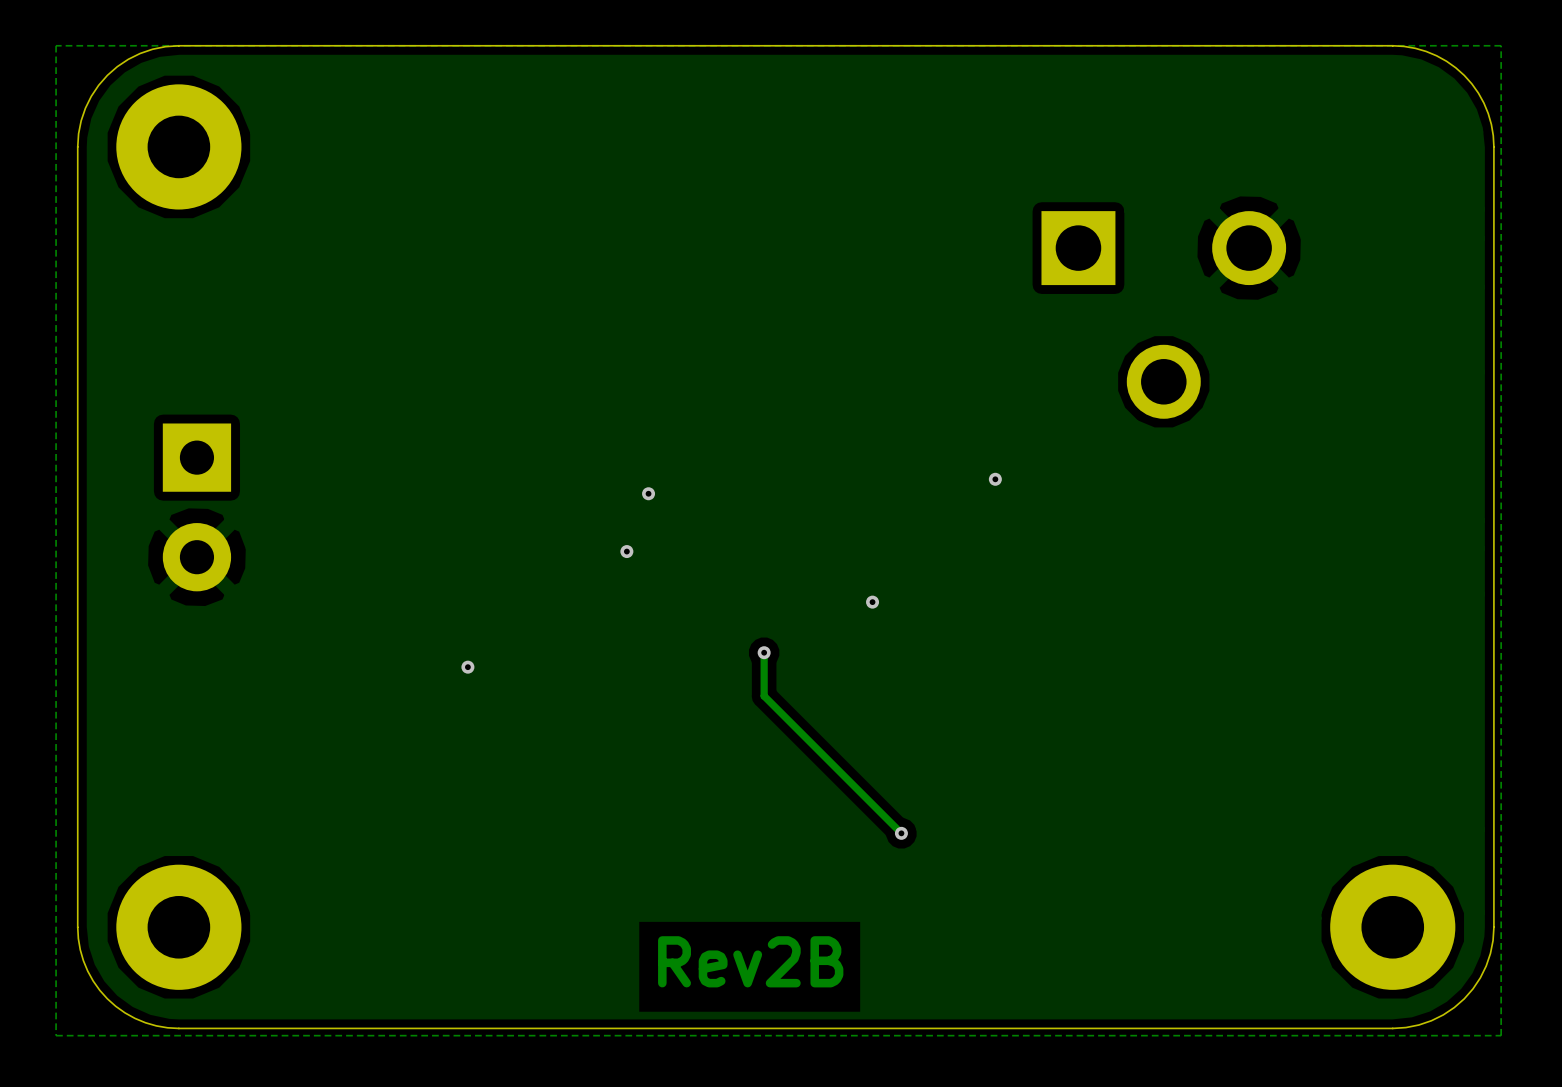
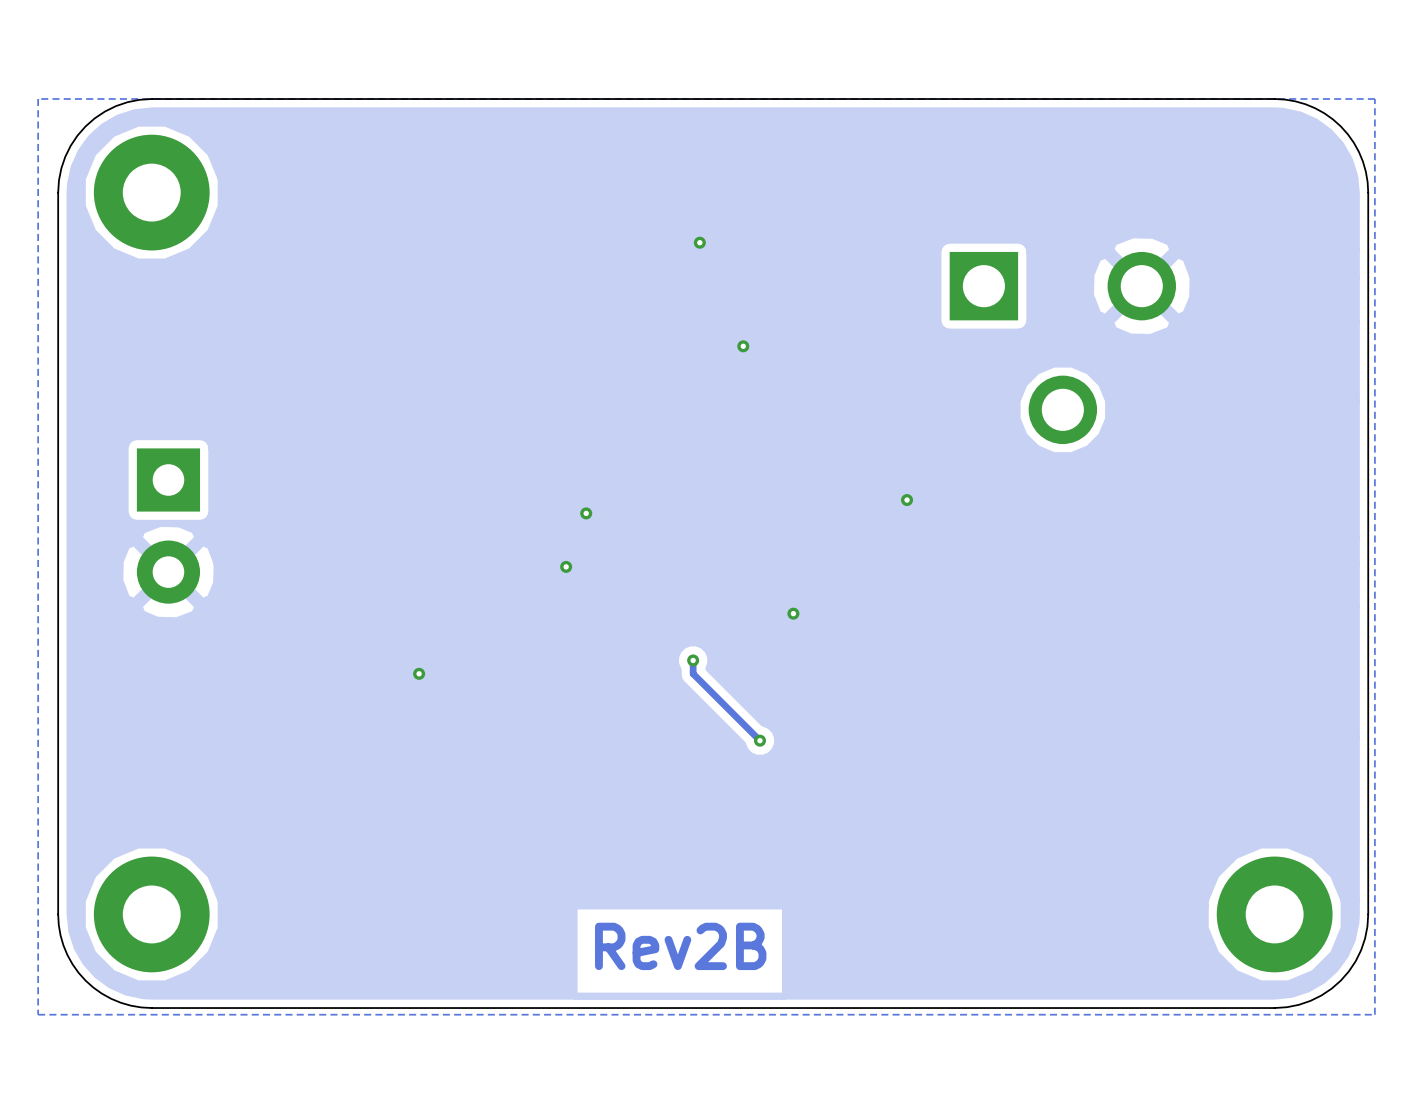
via: none -> (699, 242)
via: none -> (743, 346)
track: (764, 667) (764, 696) (901, 833) -> (693, 673) (759, 740)
via position: (901, 833) -> (759, 740)

